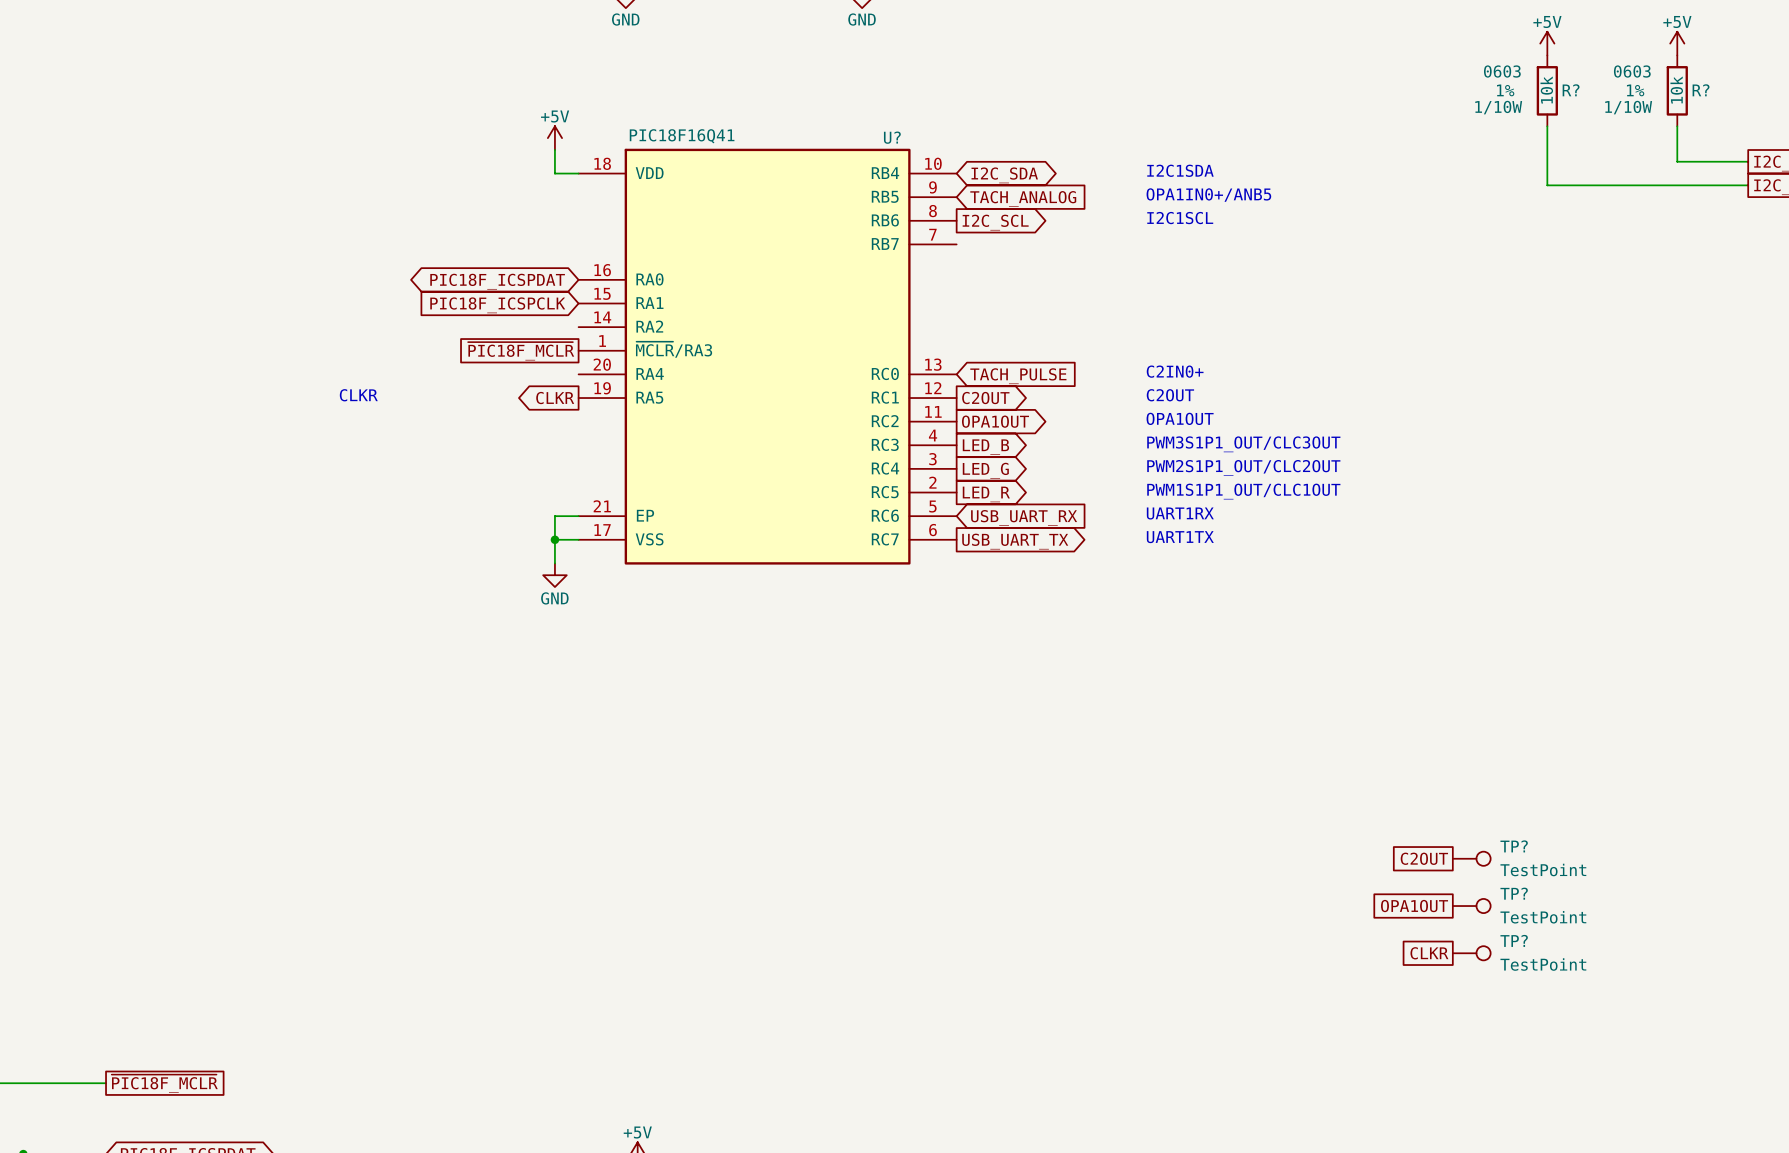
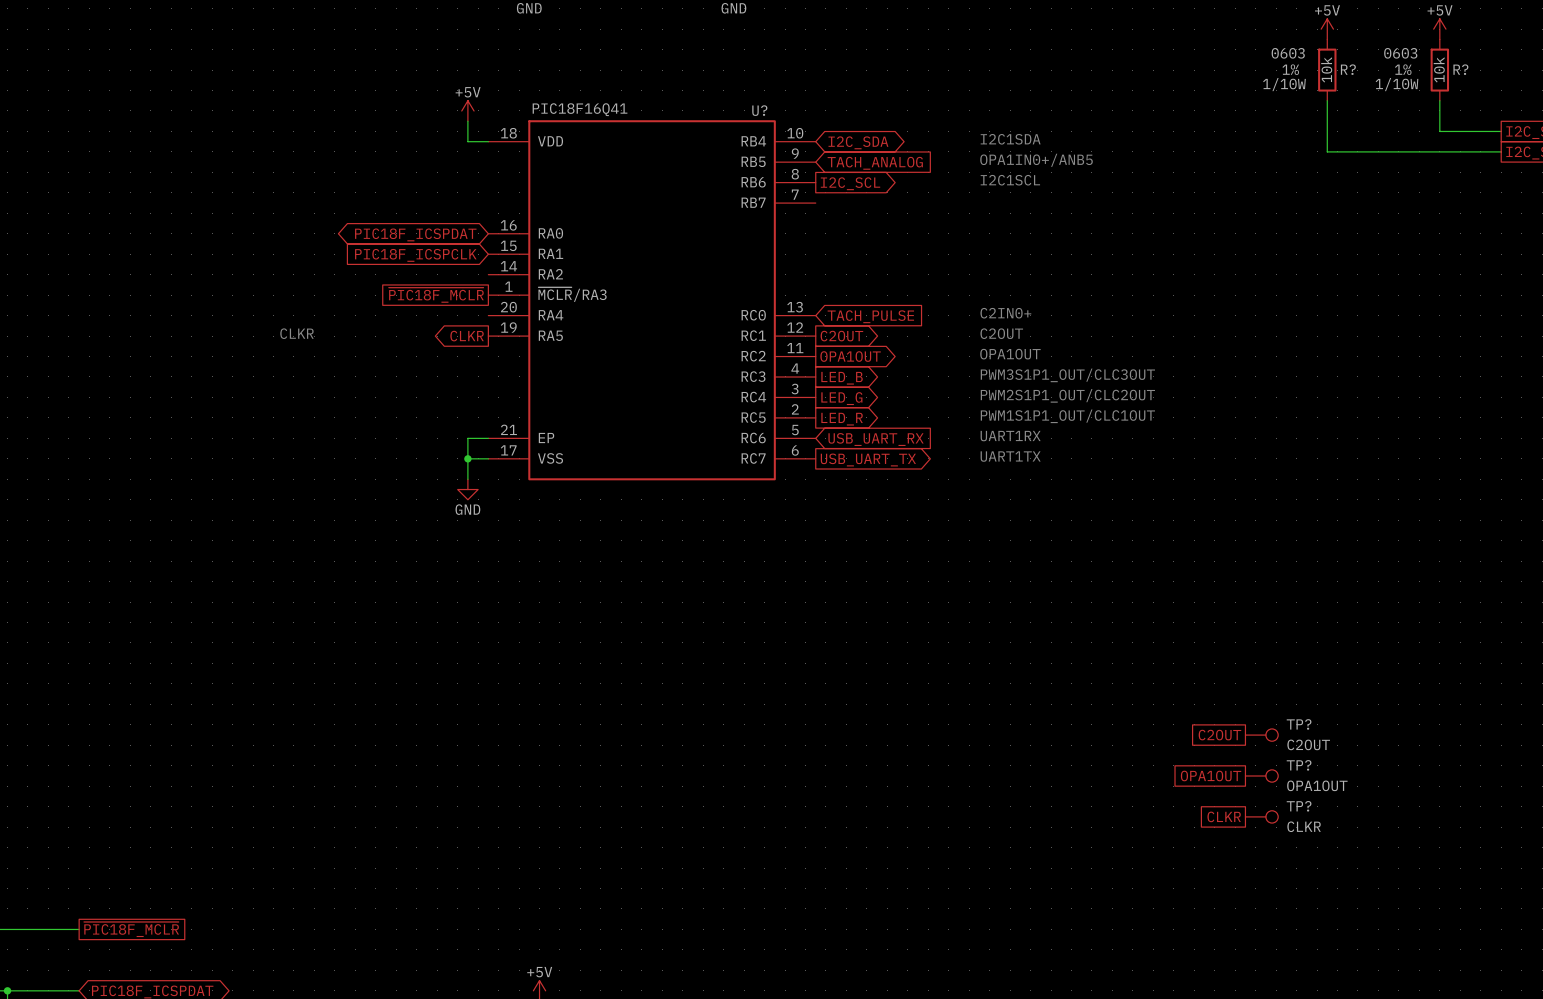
TP? value: TestPoint (1543, 870) -> C2OUT (1308, 744)
TP? value: TestPoint (1543, 917) -> OPA1OUT (1317, 785)
TP? value: TestPoint (1543, 964) -> CLKR (1304, 826)

